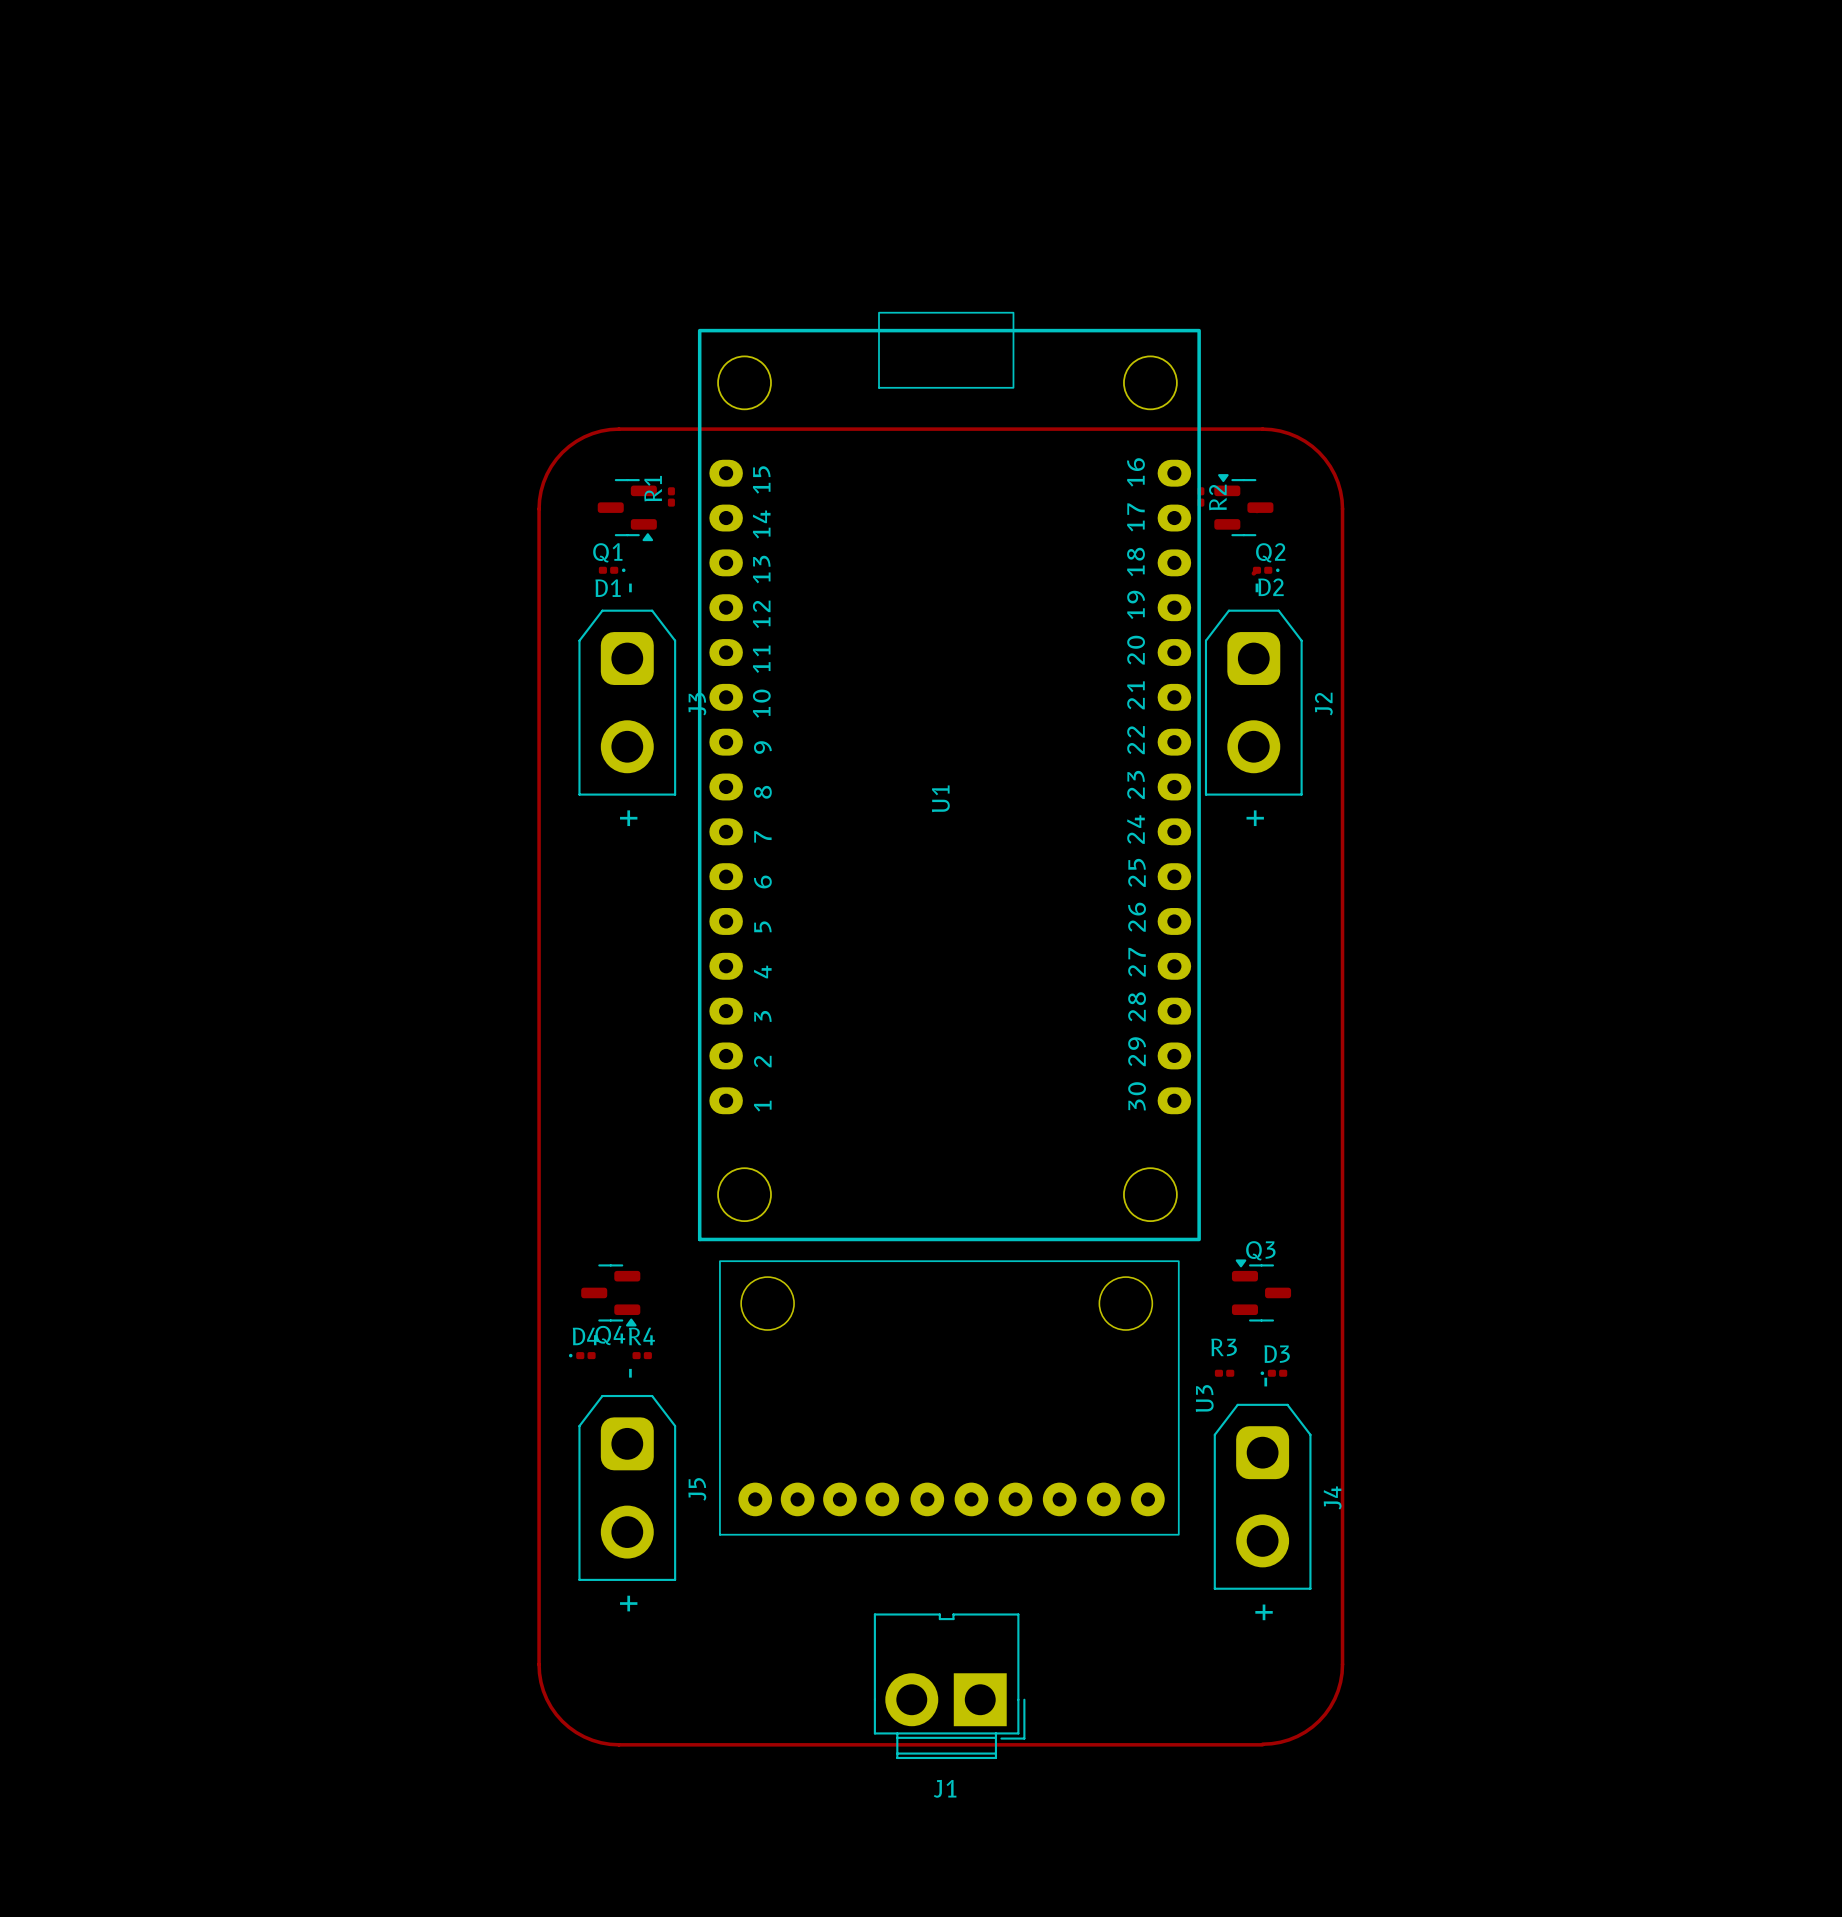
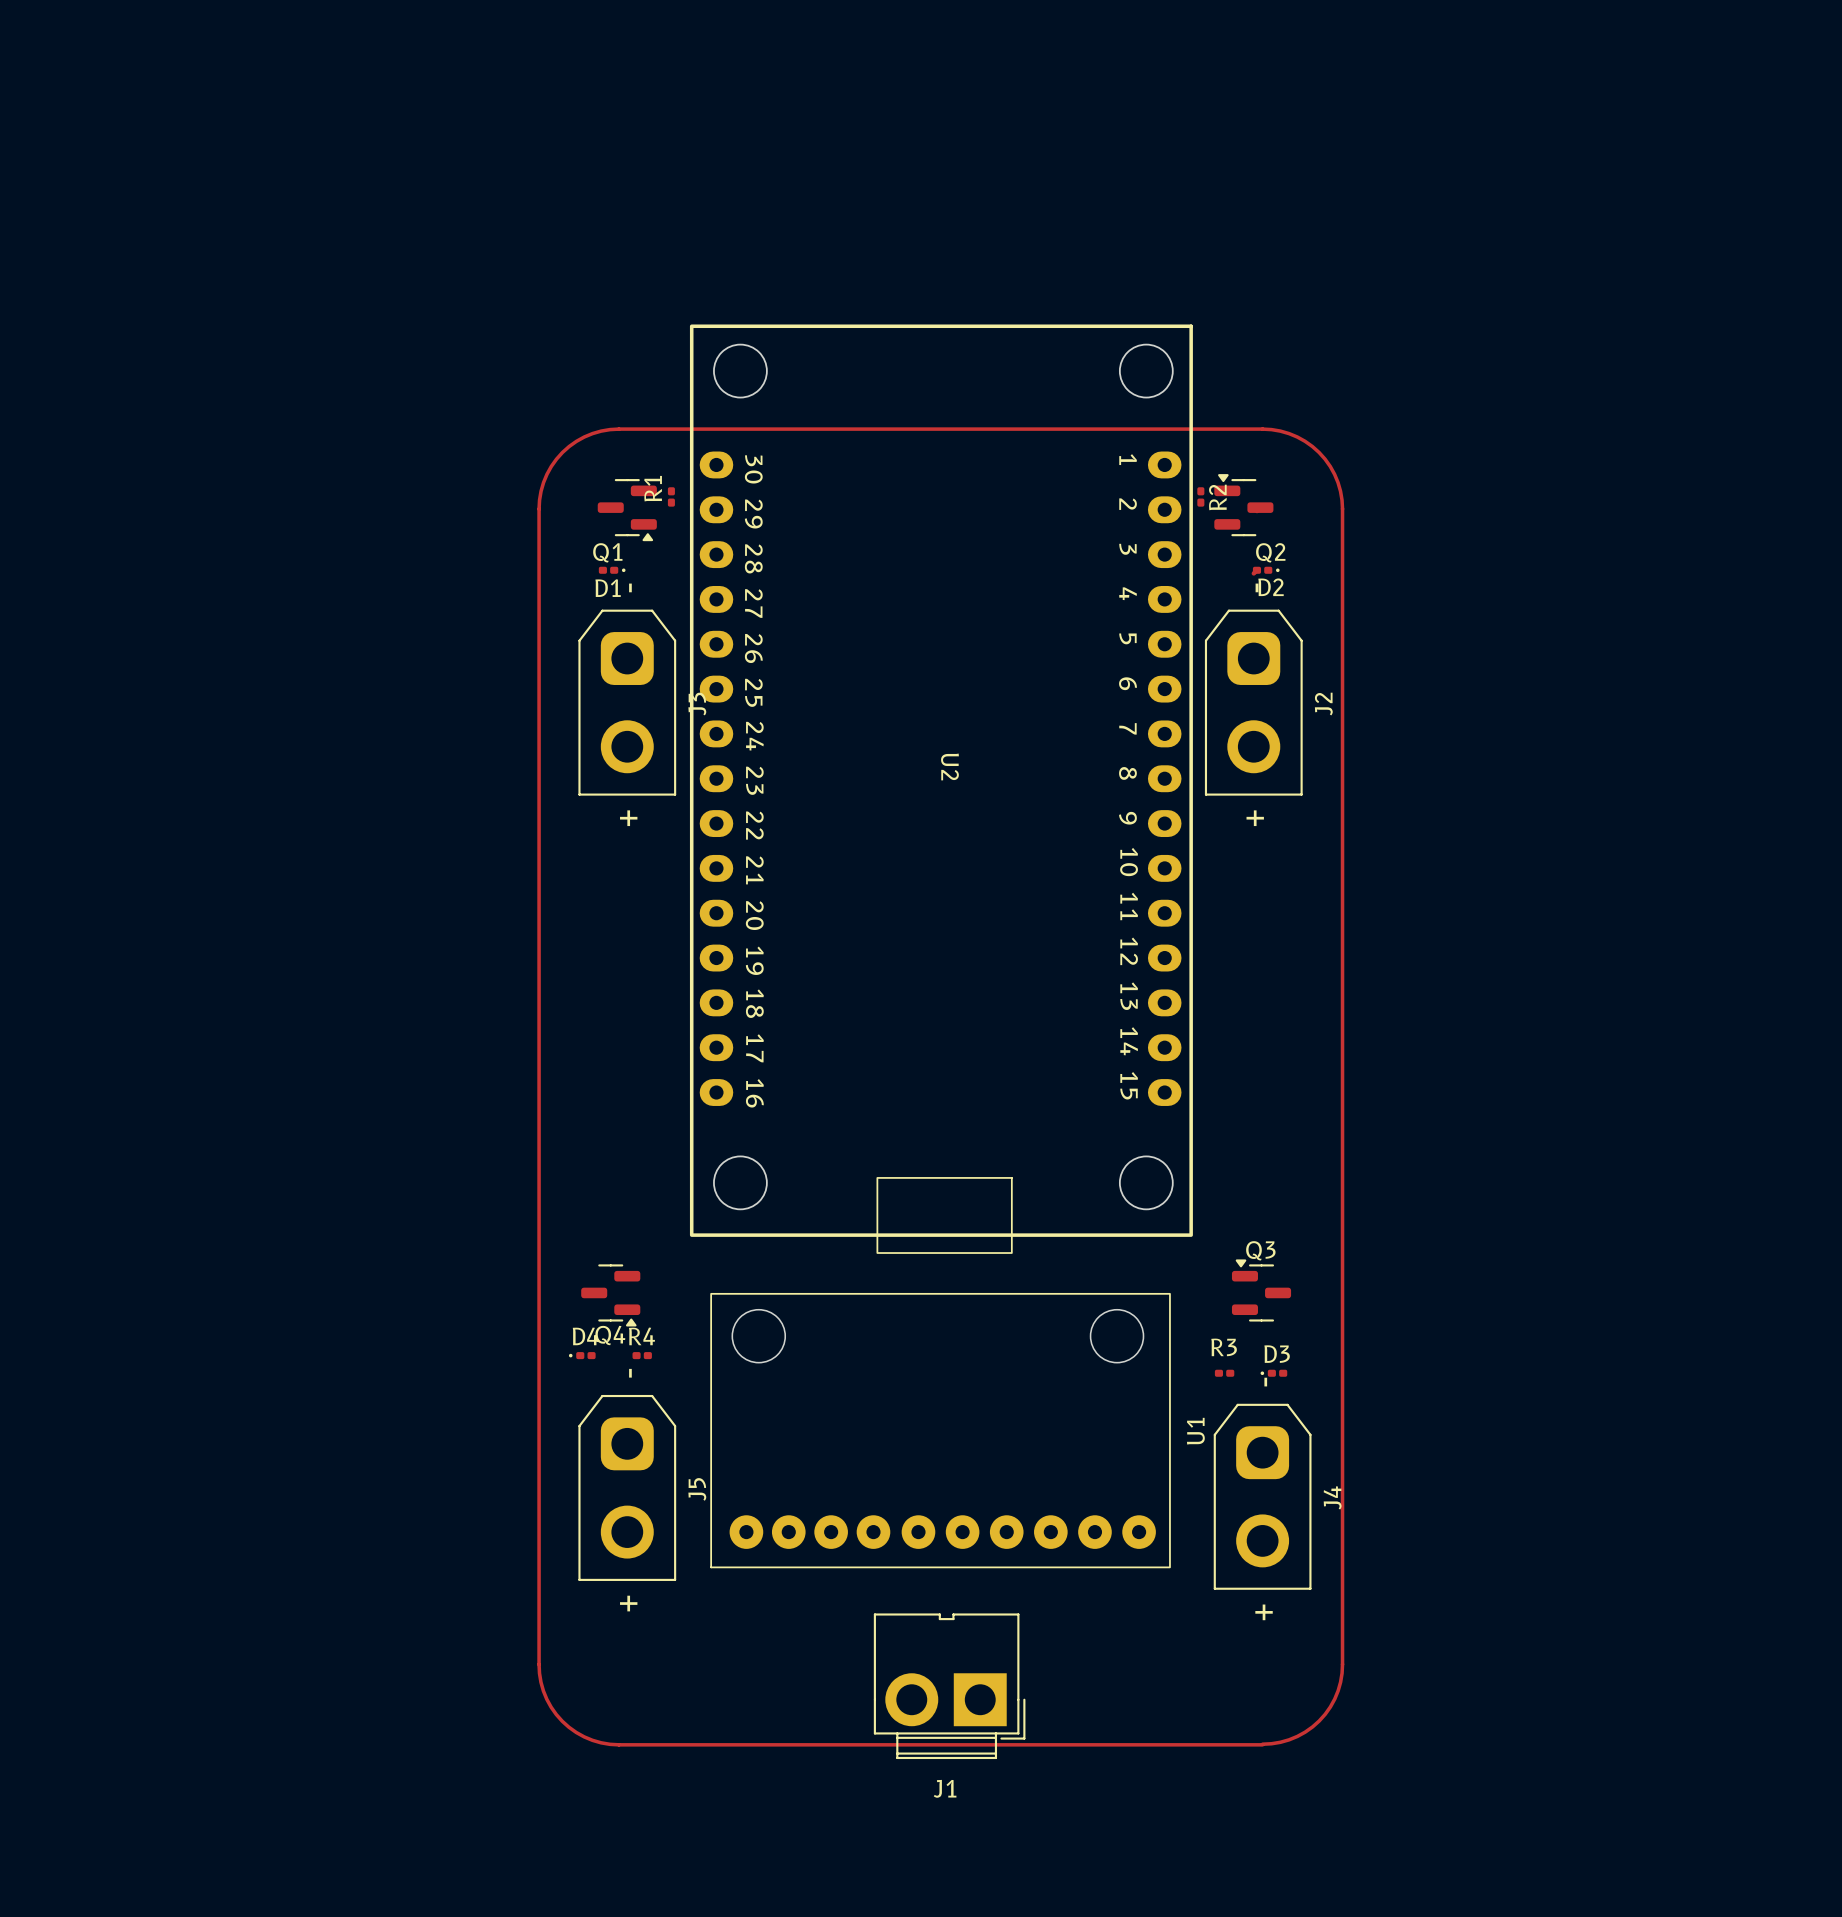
U1 footprint: [697, 311, 1201, 1242] -> [710, 1292, 1171, 1569]
U2: none -> (941, 789)
U1 name position: U1 (940, 798) -> U1 (1195, 1431)
U3: (949, 1397) -> none

